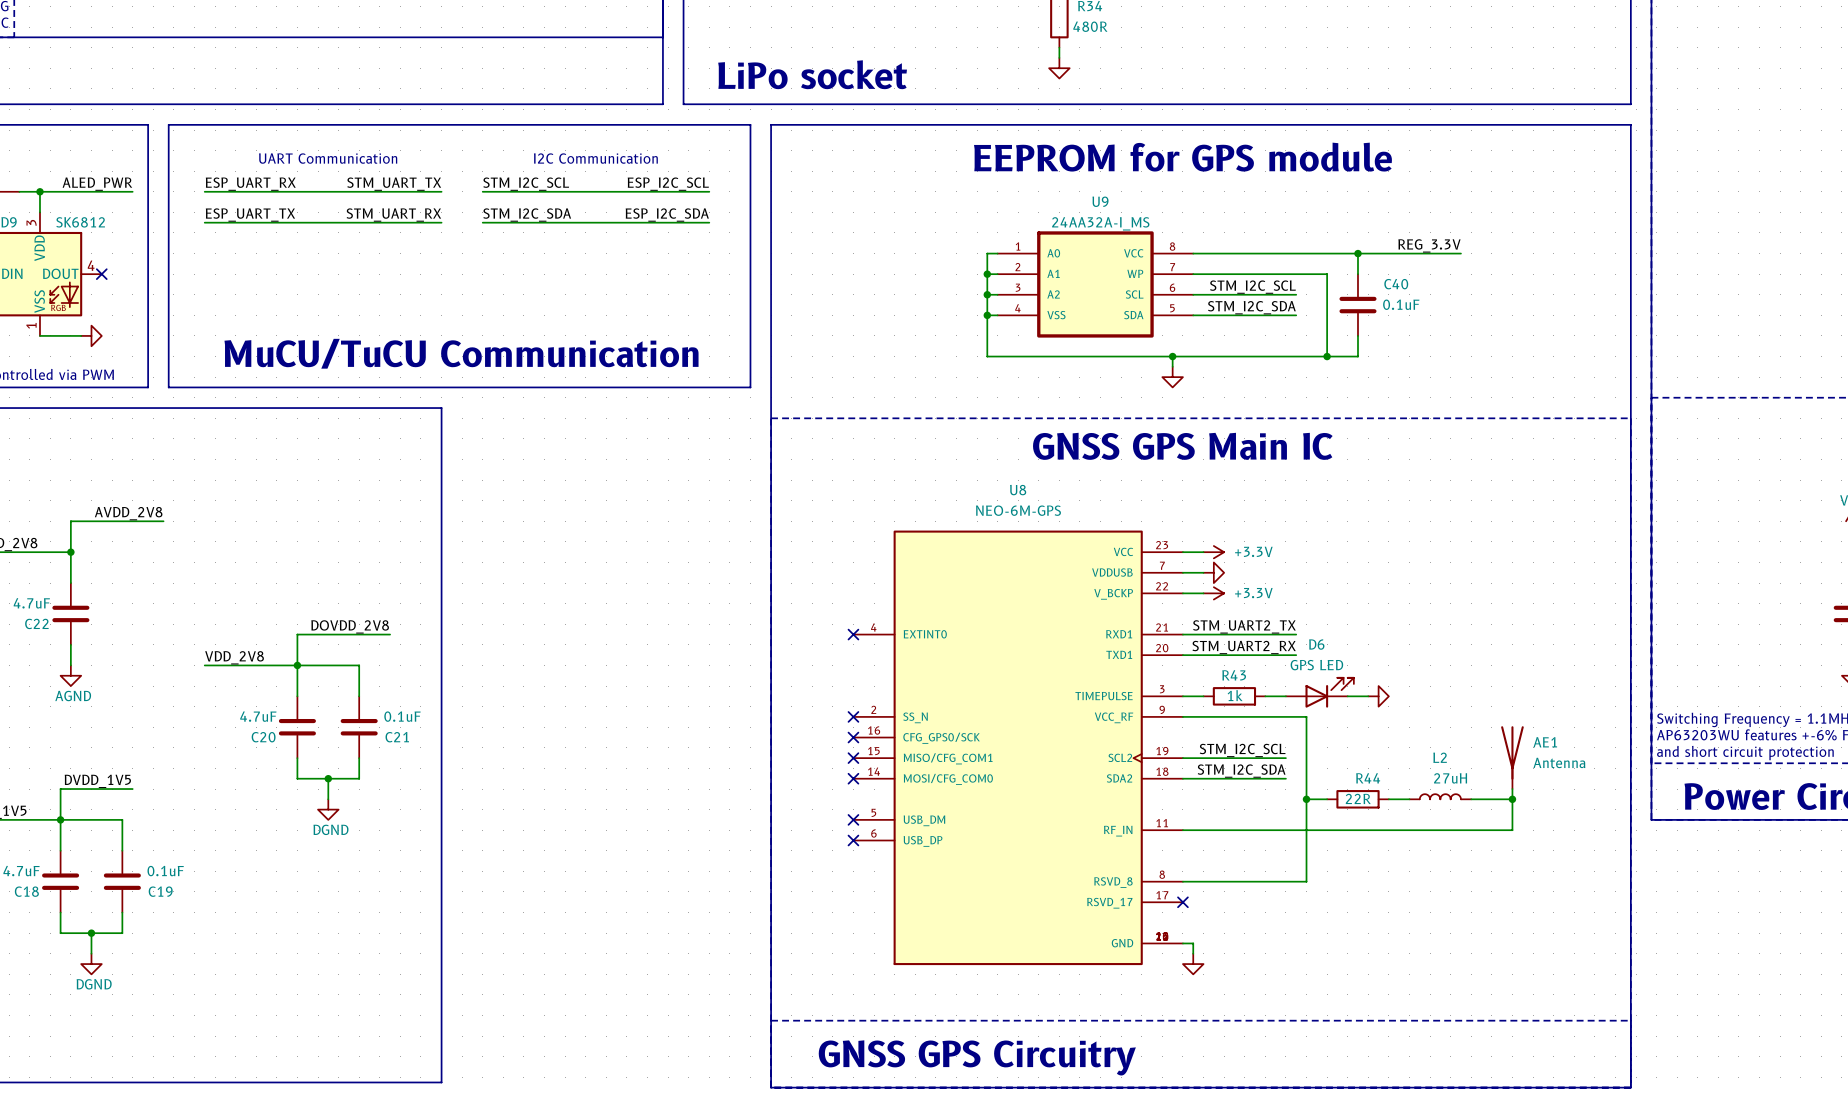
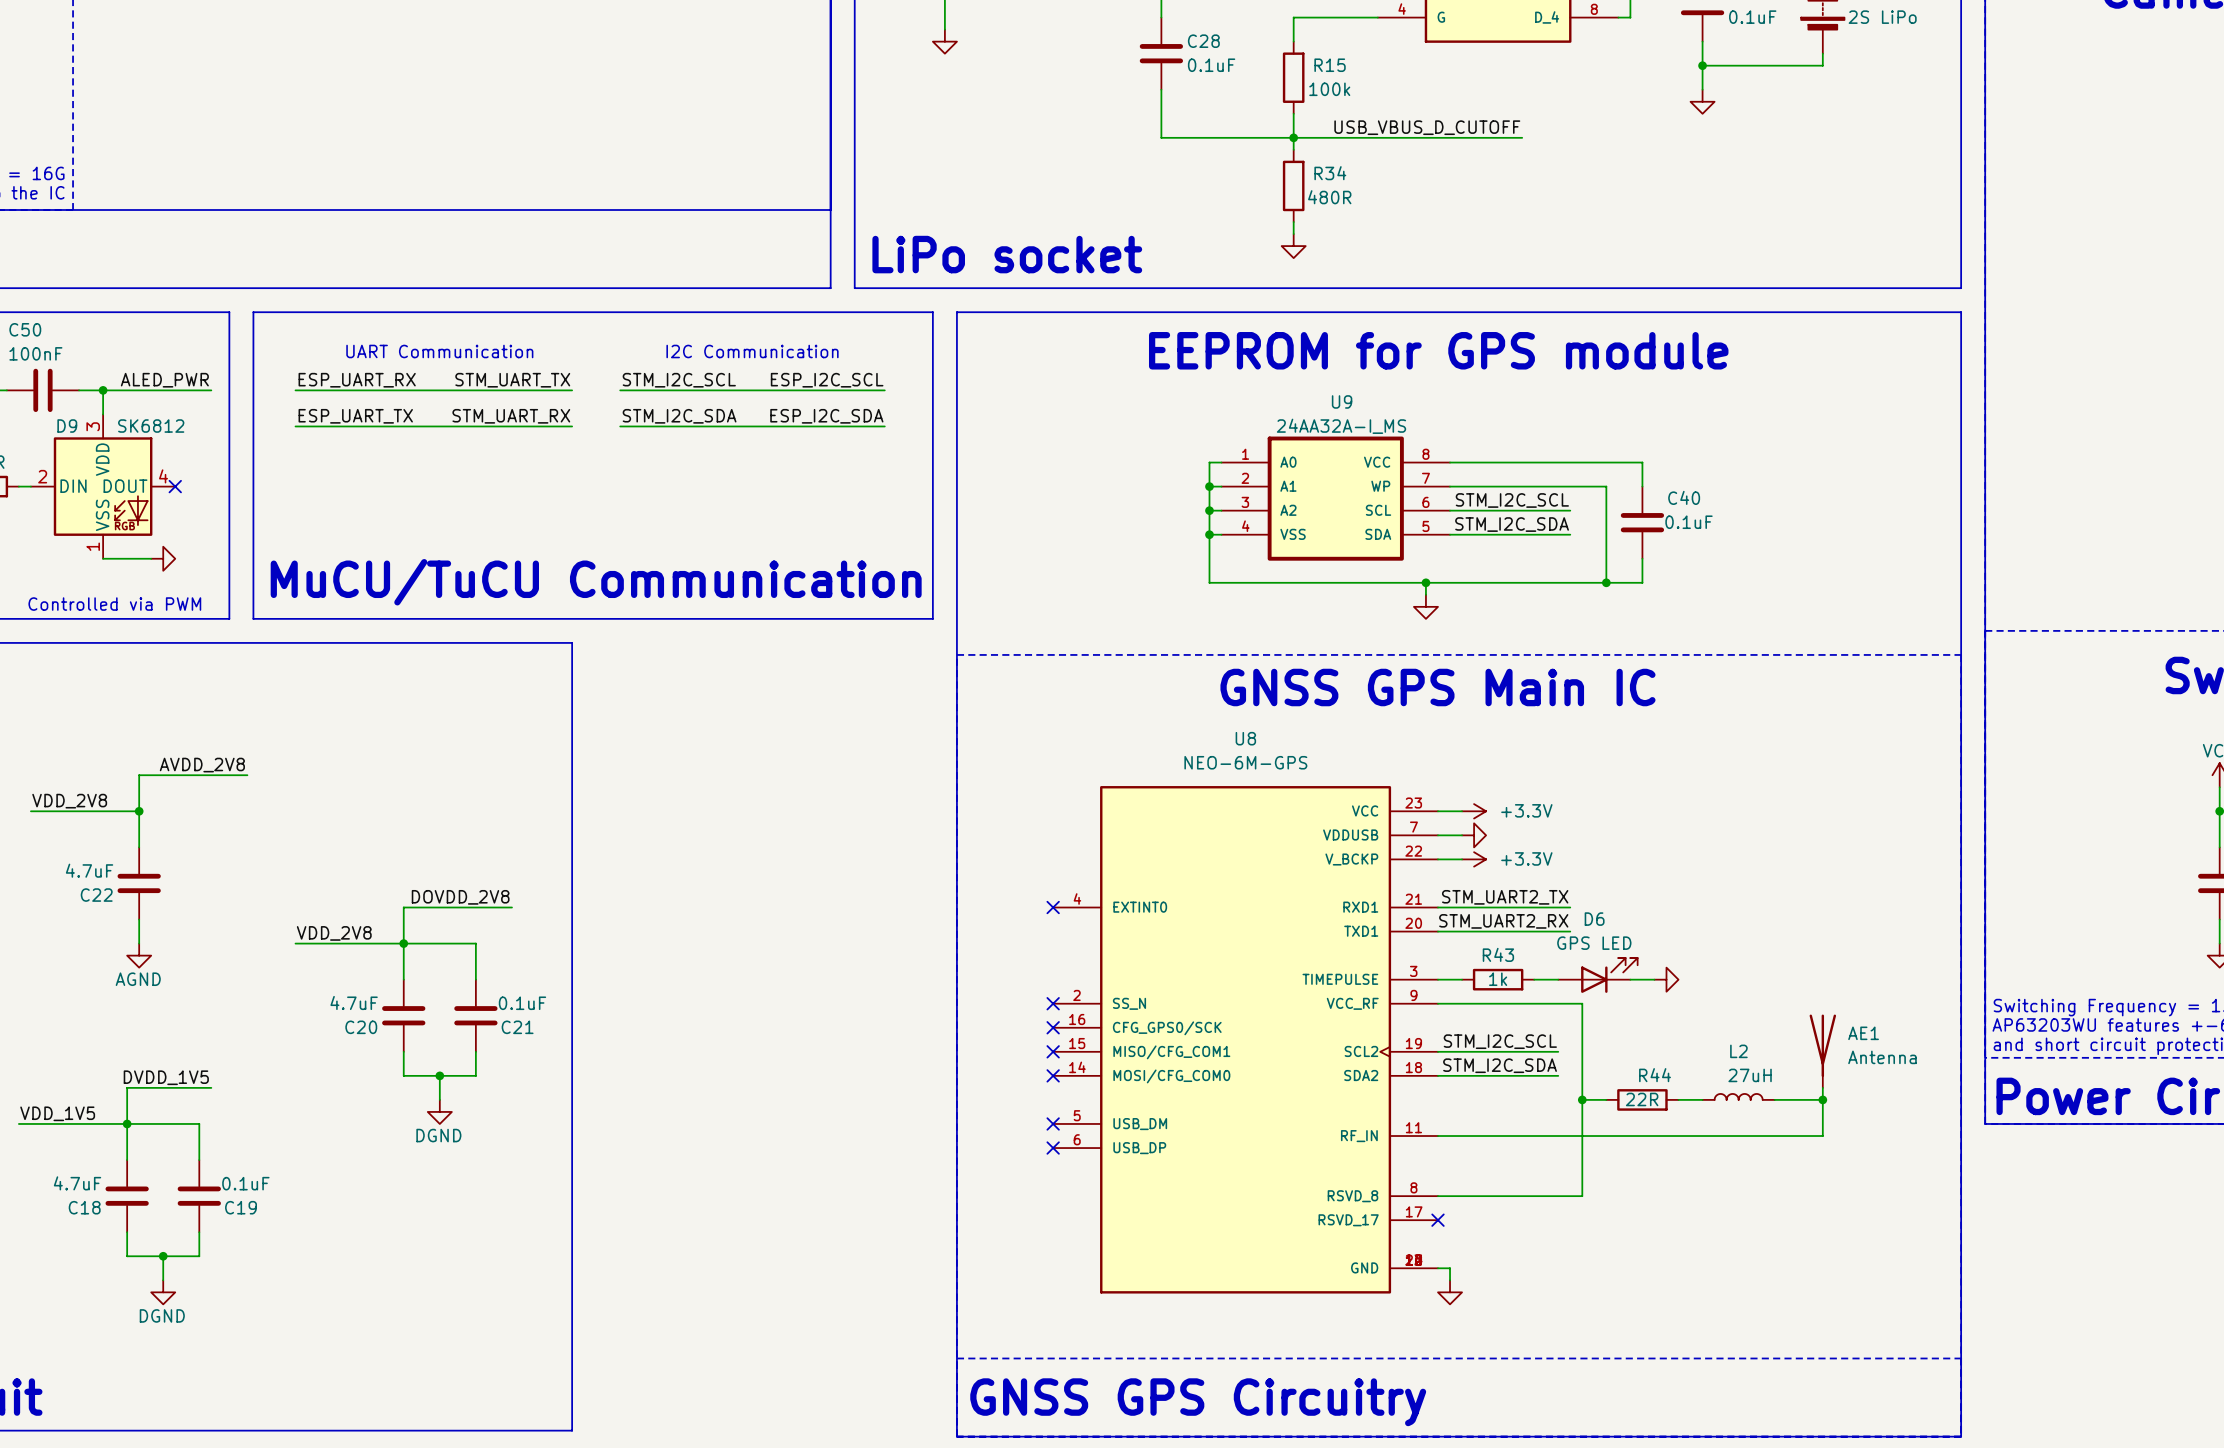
label: REG_3.3V (1429, 245) -> none
wire: (1357, 253) (1460, 253) -> none
junction: (1357, 253) -> none

